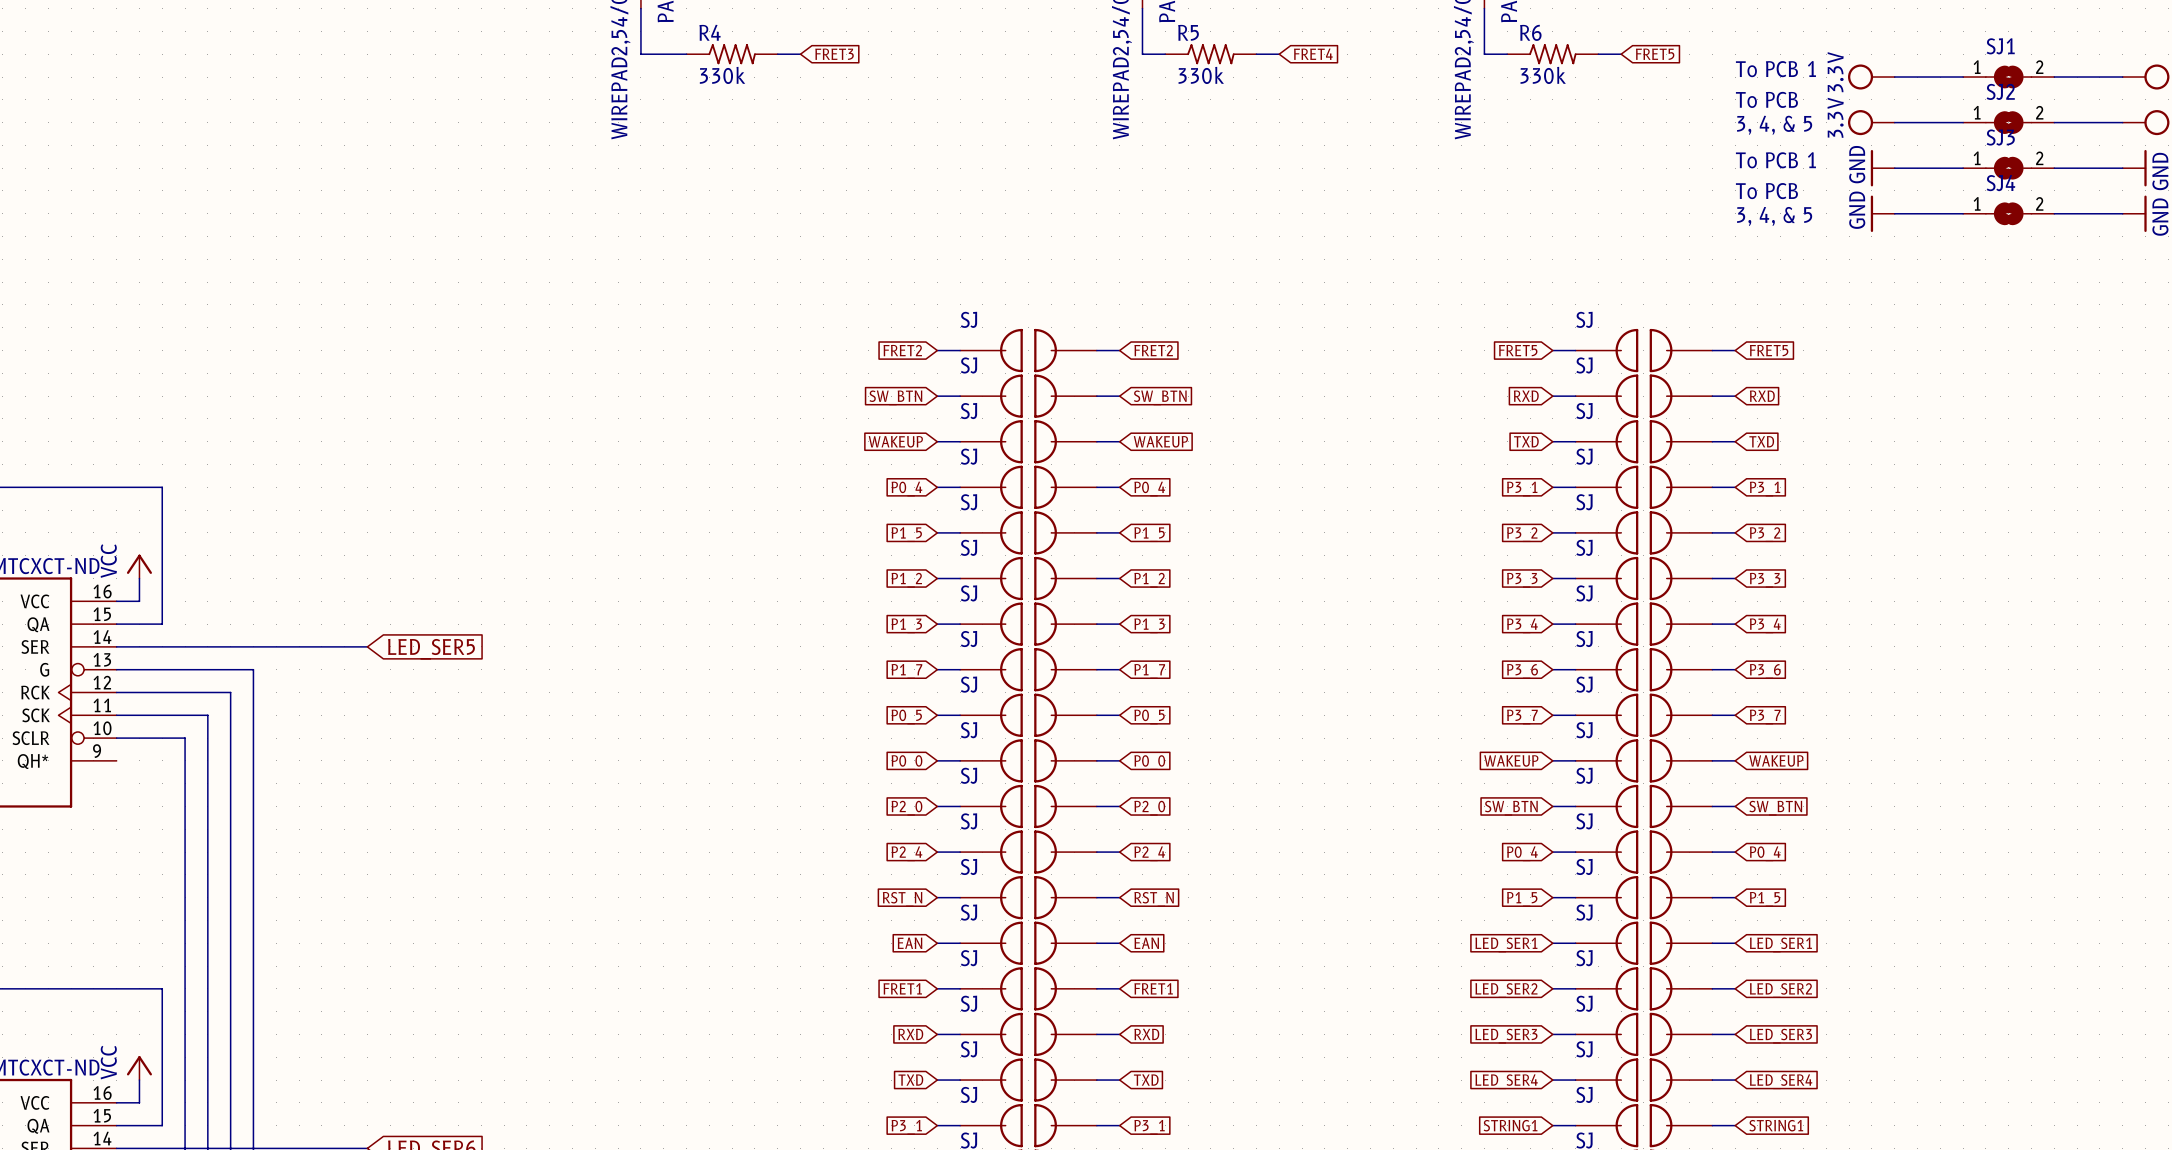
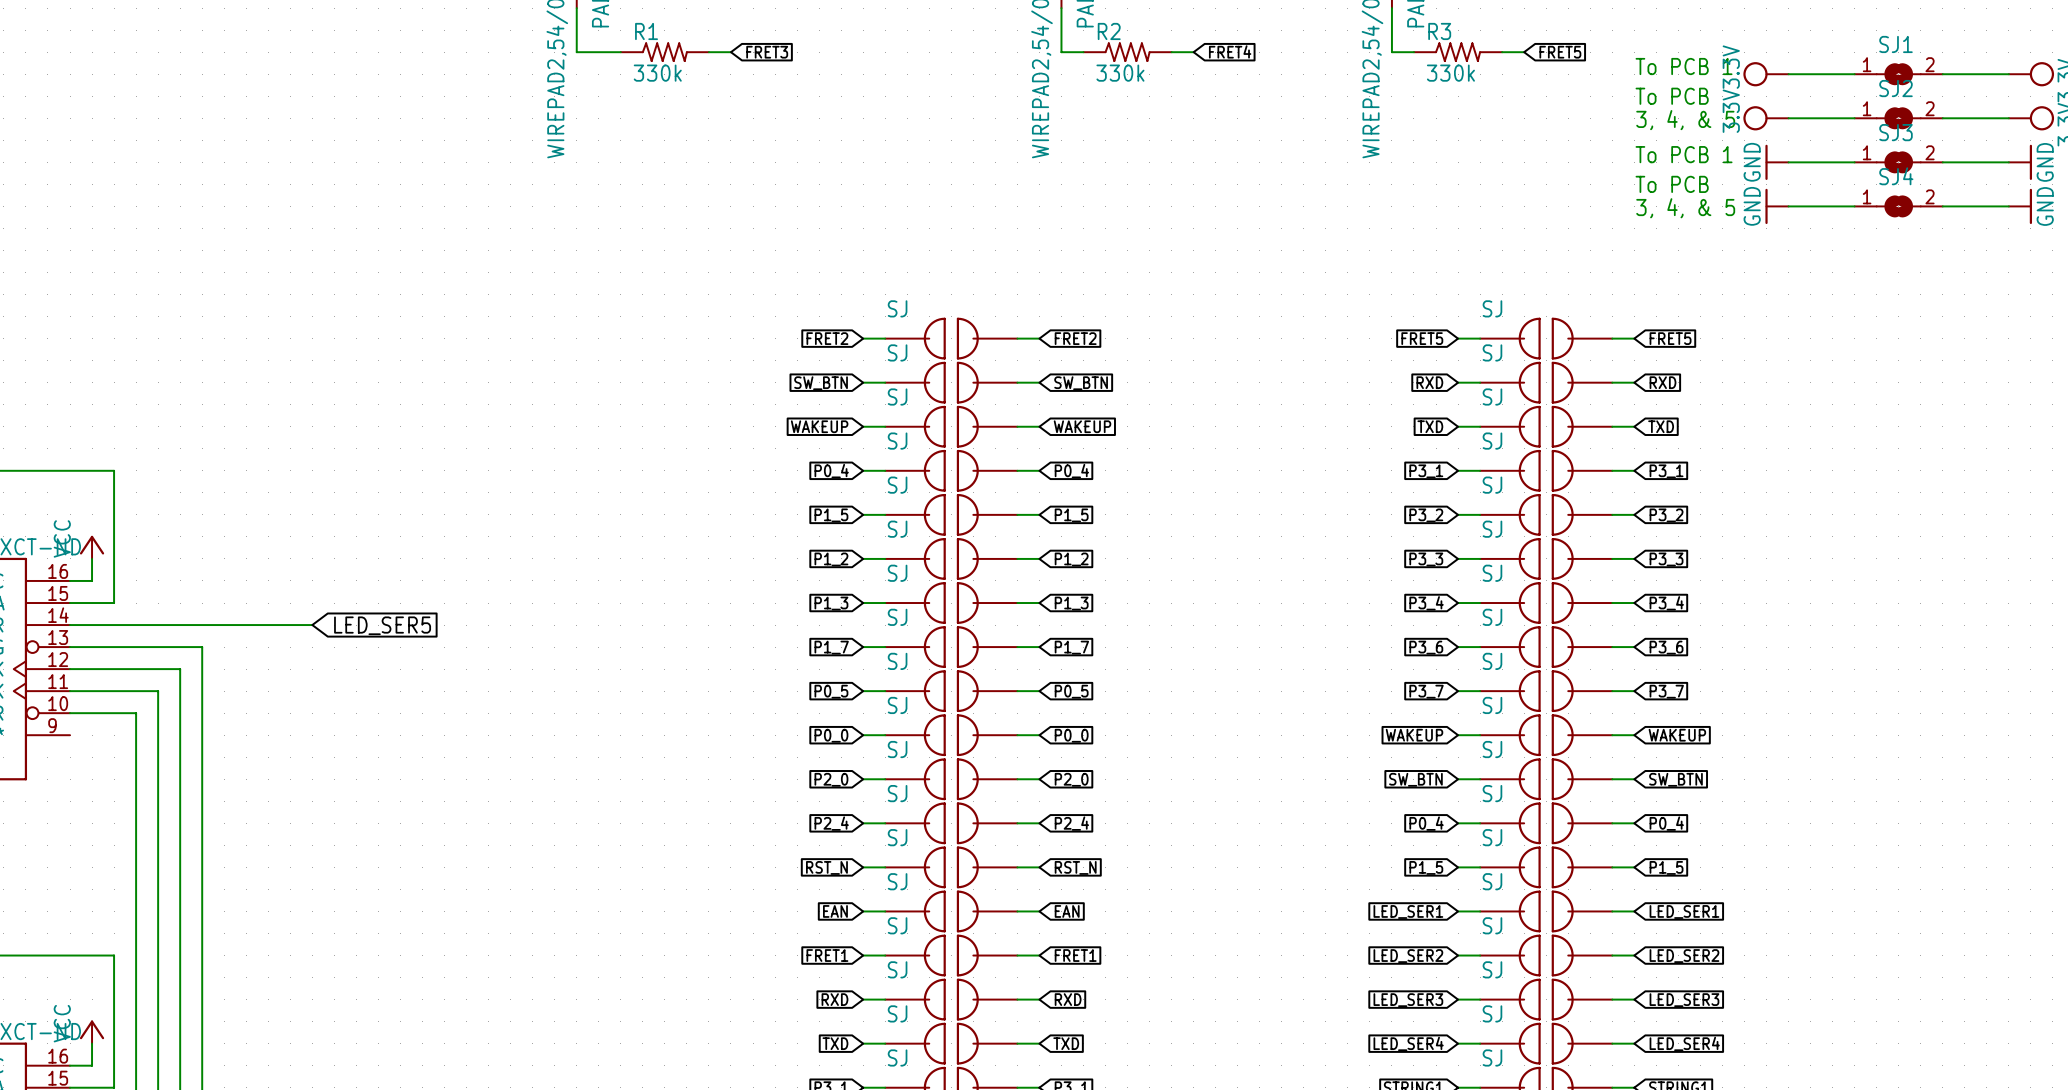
R4 name: R4 (710, 32) -> R1 (646, 31)
R5 name: R5 (1188, 32) -> R2 (1109, 31)
R6 name: R6 (1530, 32) -> R3 (1439, 31)

